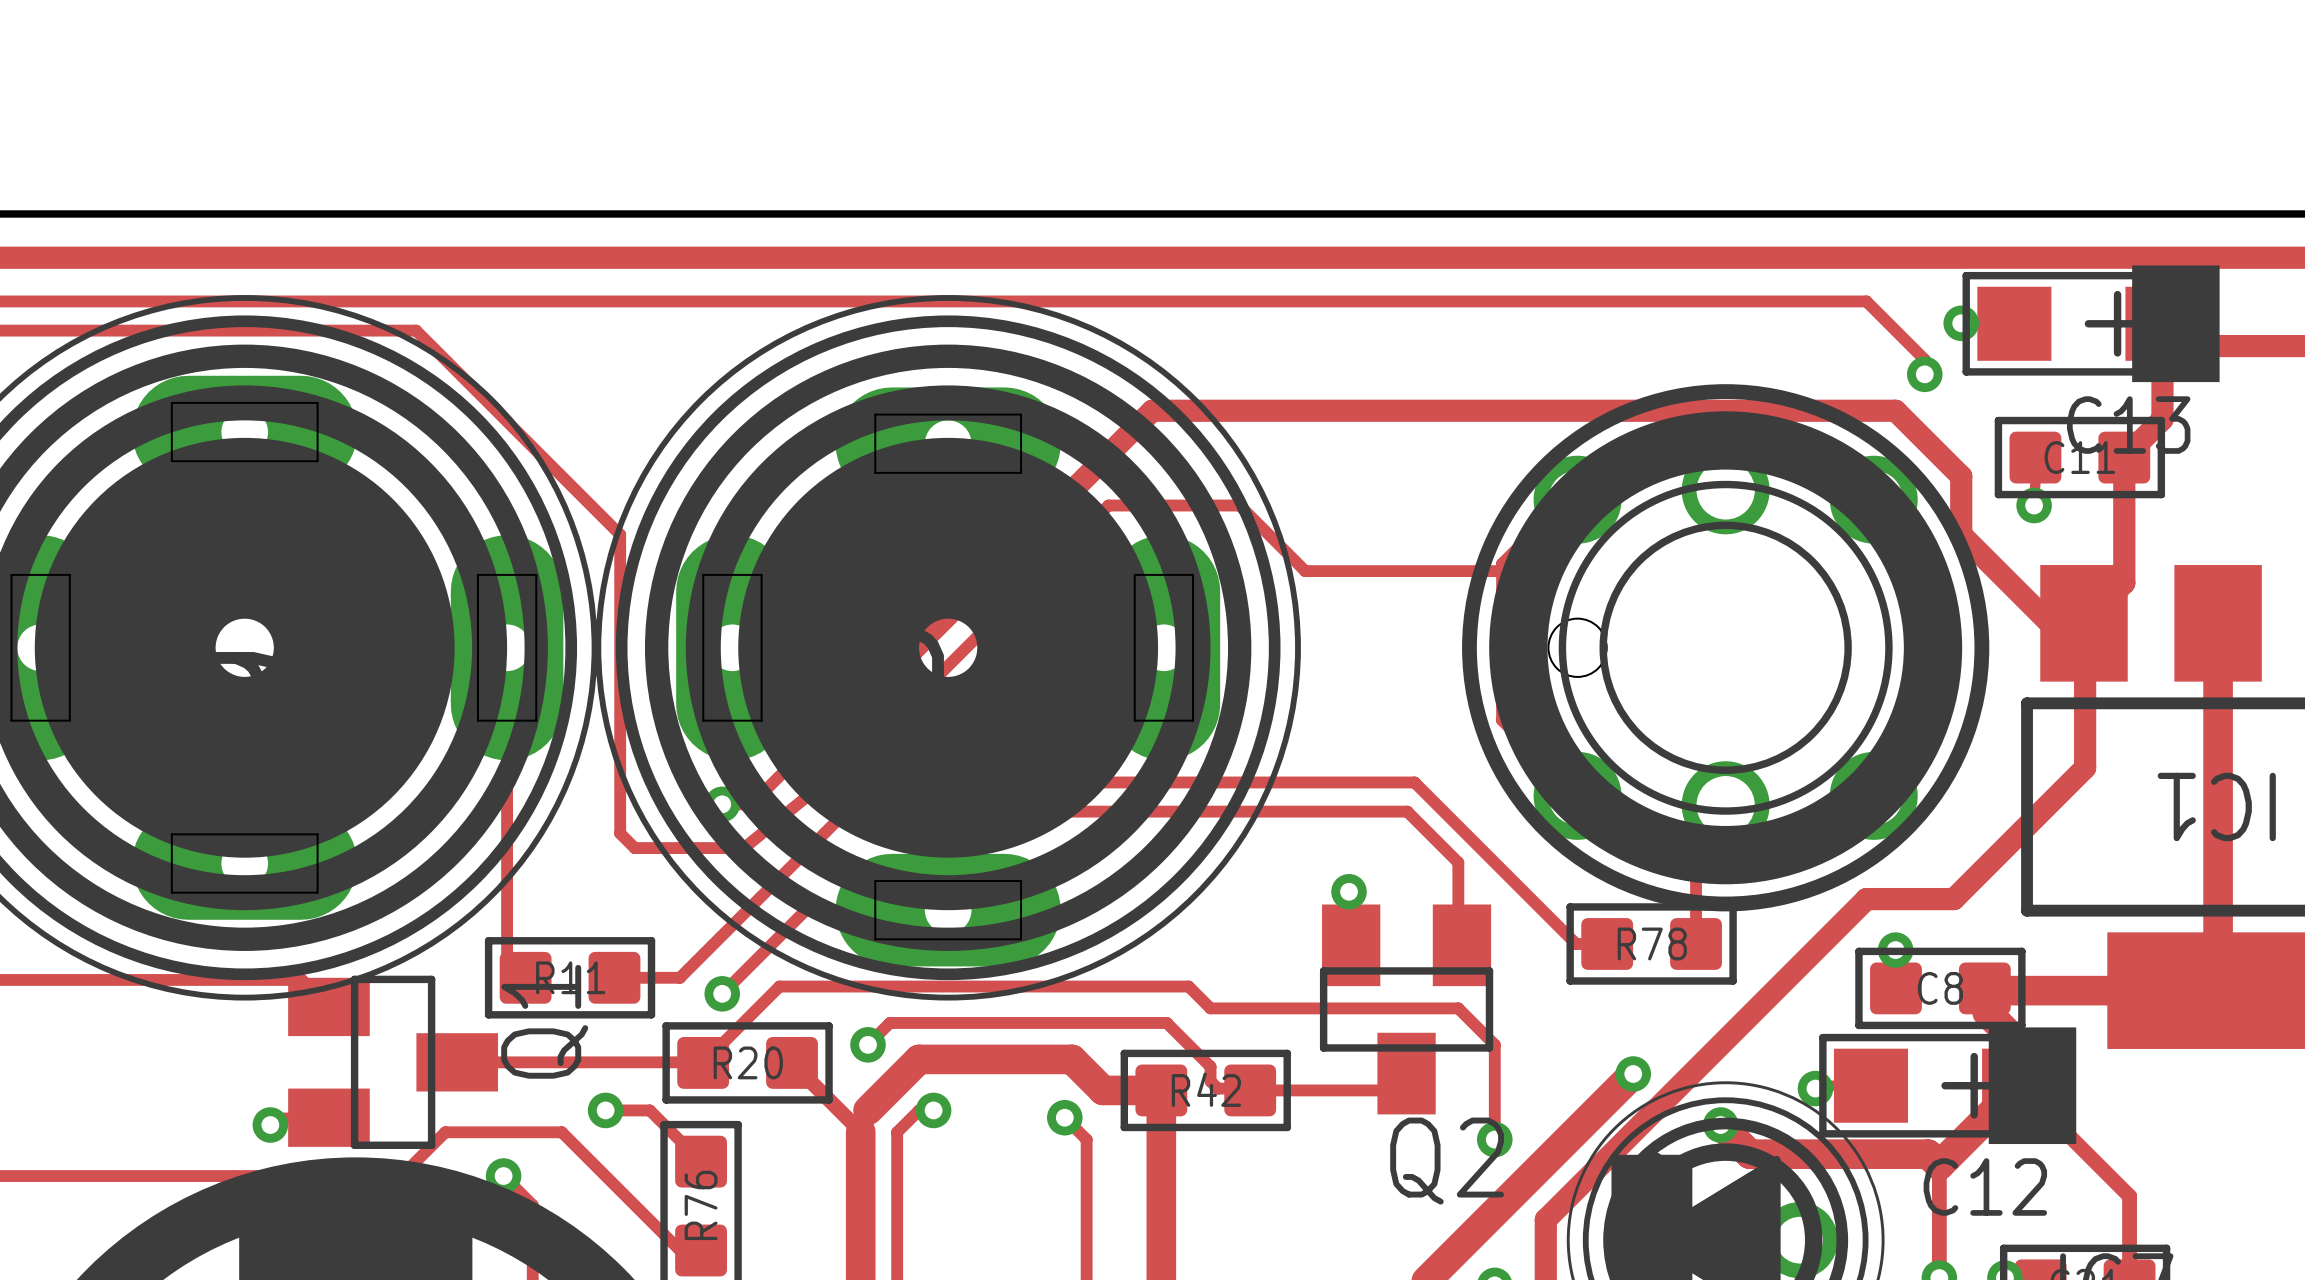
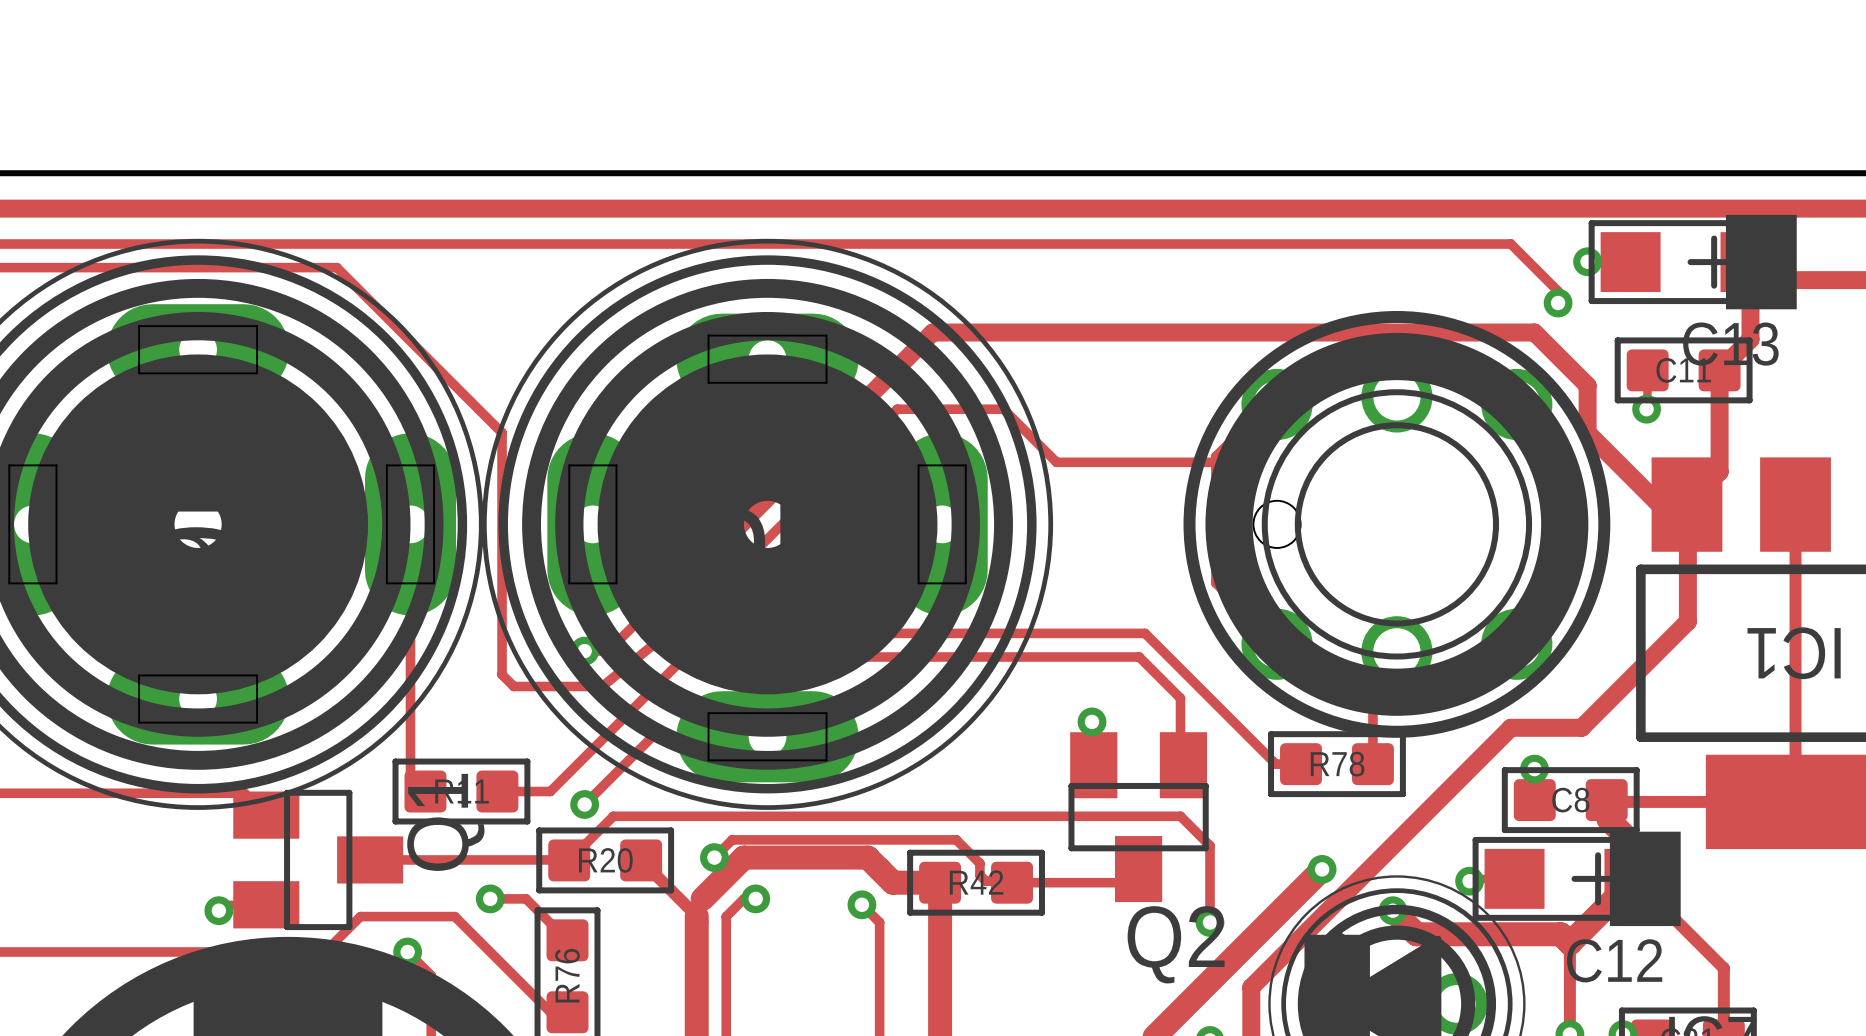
track width: thick (2218, 623) (2218, 990) (1987, 990) -> thin (1795, 504) (1795, 801) (1608, 801)
track: (757, 1008) (779, 986) (1188, 986) (1210, 1008) -> (613, 816) (979, 816)
track: (1181, 1037) (1166, 1022) (889, 1022) (868, 1044) -> (956, 839) (732, 839) (714, 857)
via position: (868, 1044) -> (714, 857)

